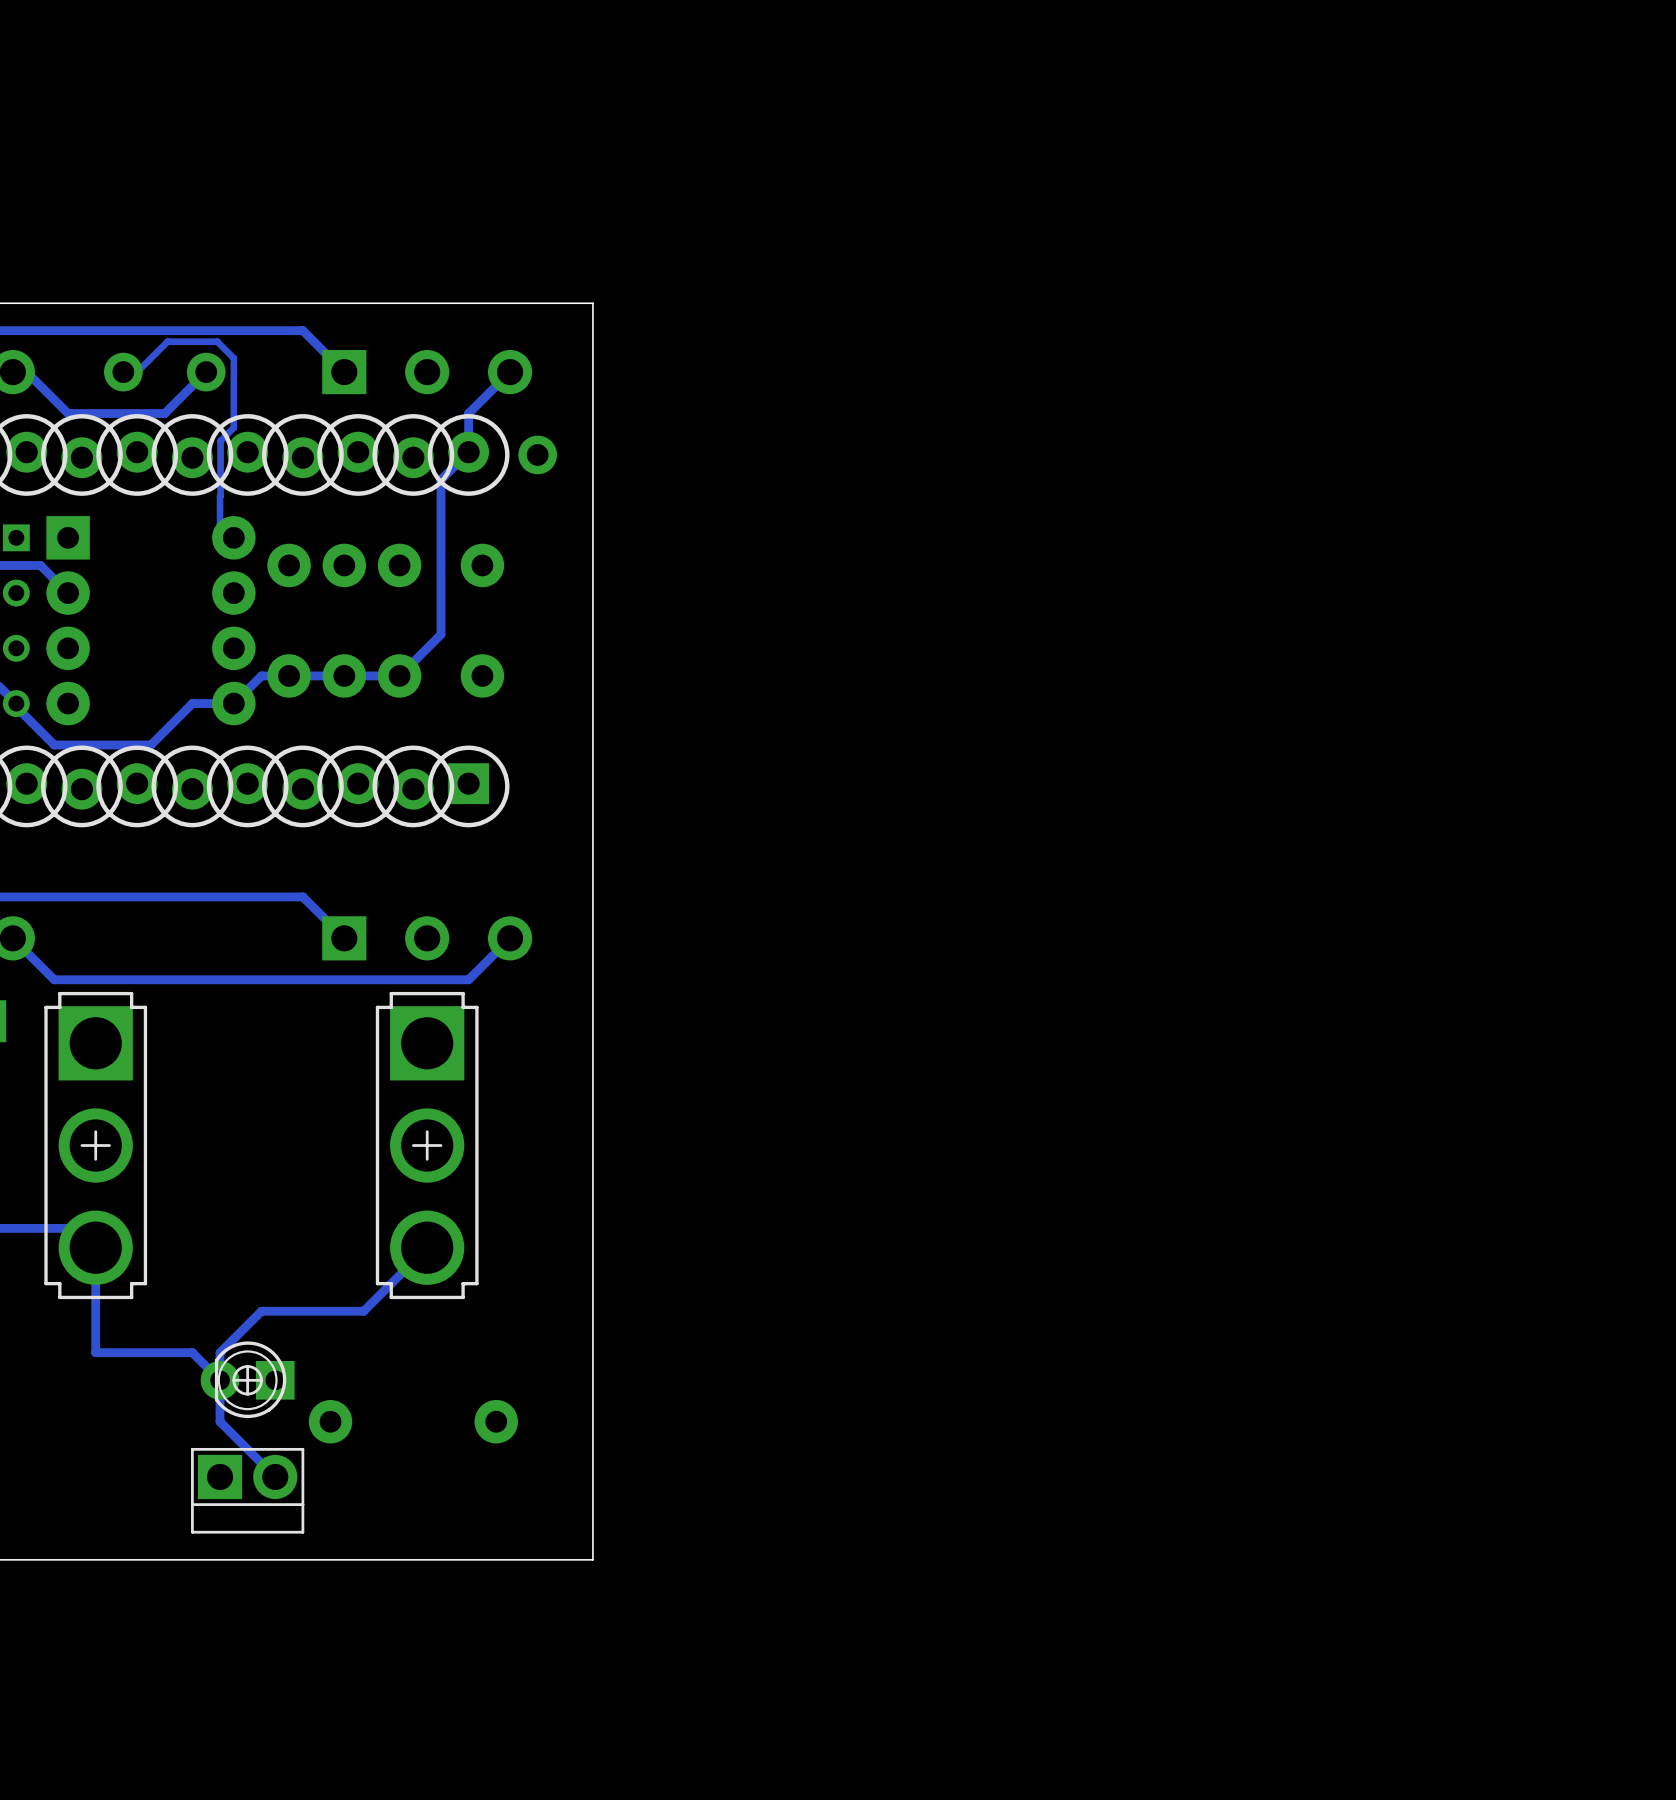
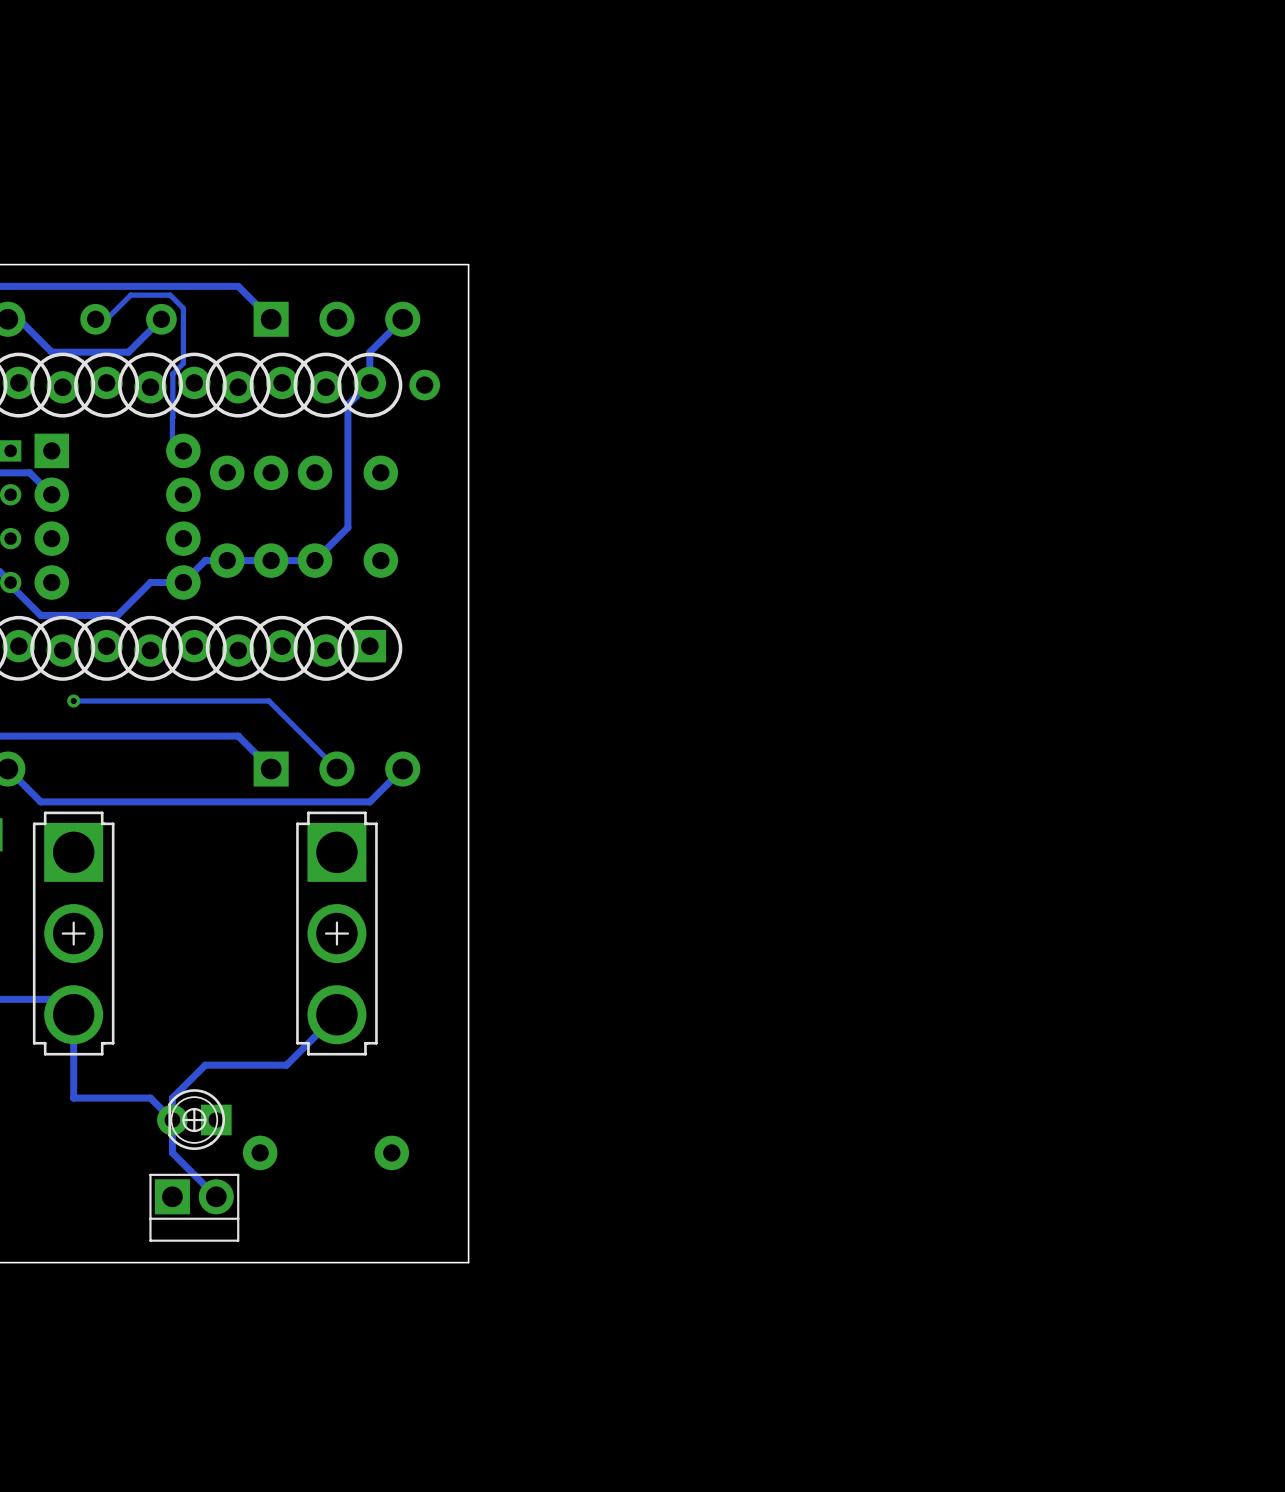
track: none -> (73, 701) (268, 701) (336, 769)
via: none -> (73, 701)

